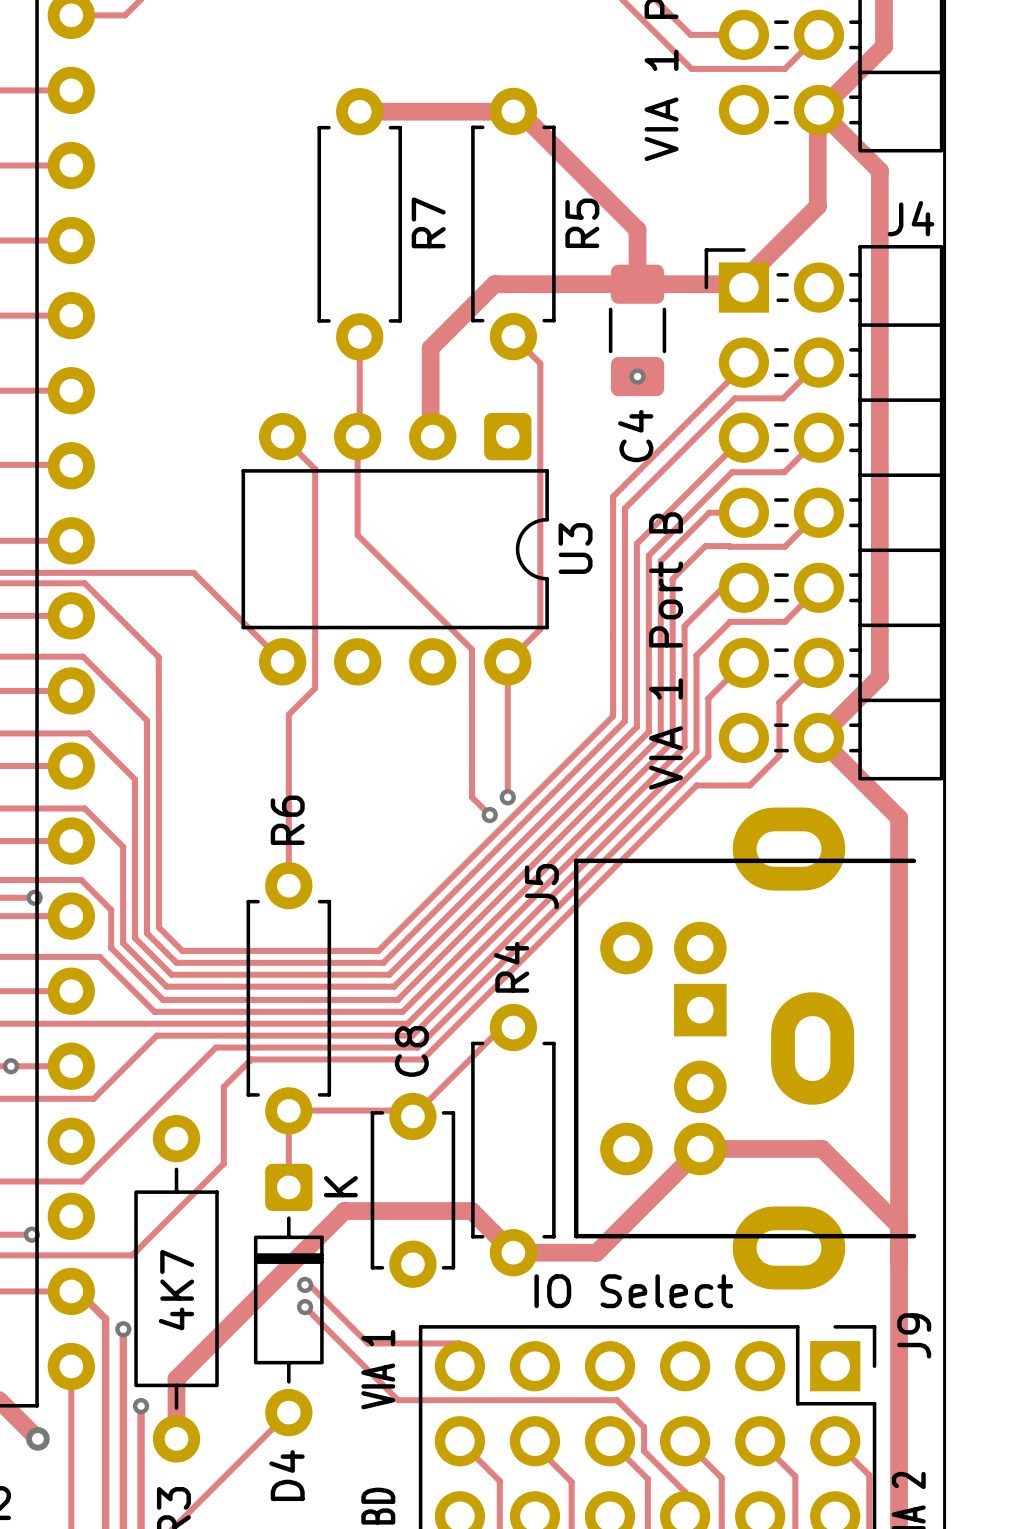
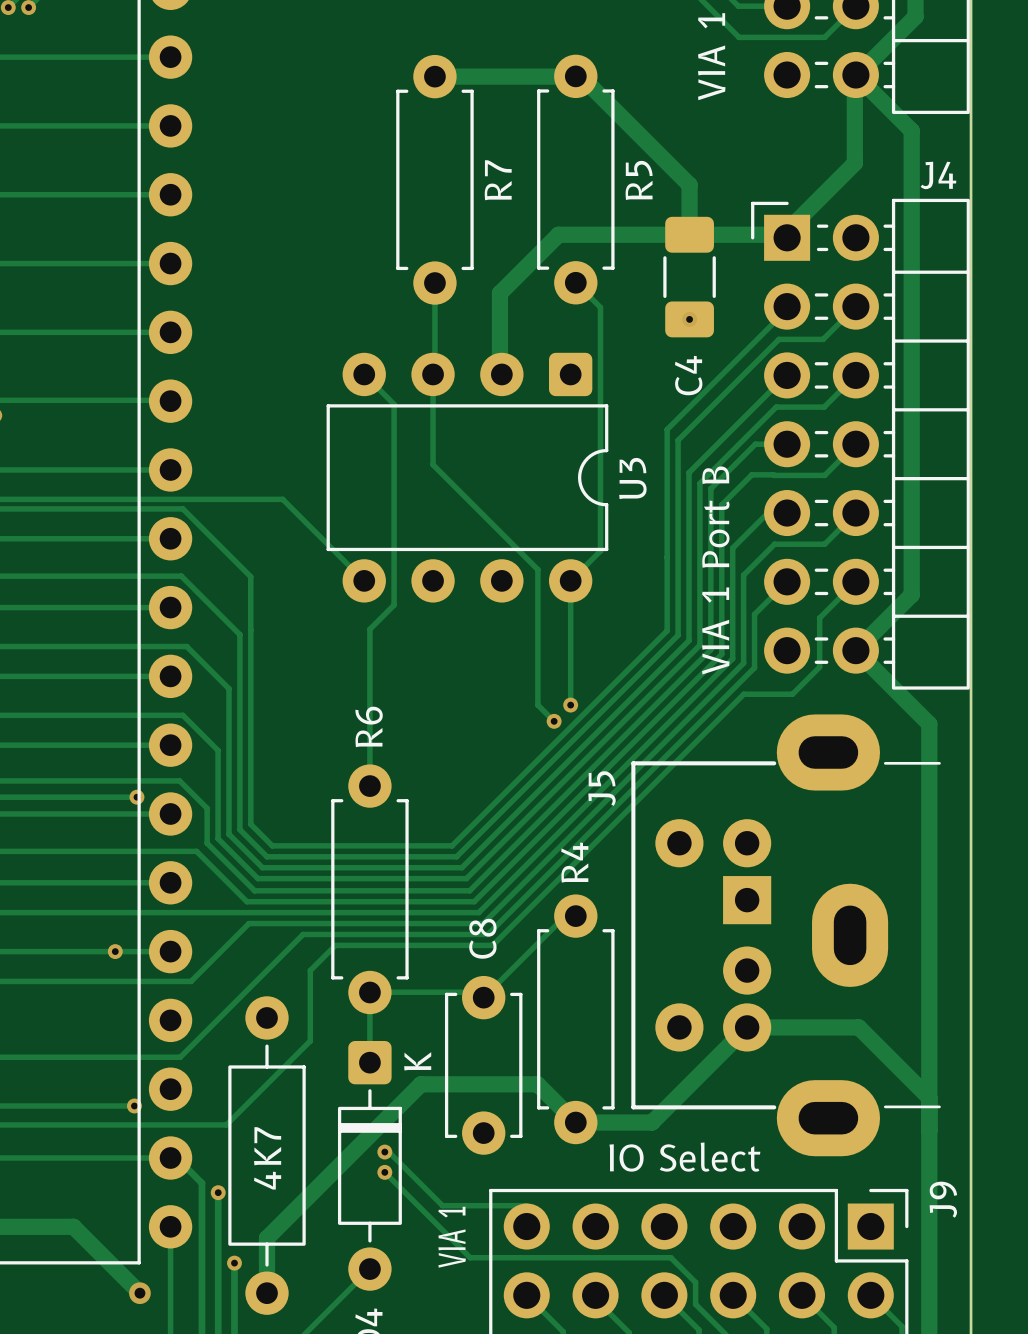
J5 footprint: [573, 807, 917, 1290] -> [631, 714, 941, 1157]

